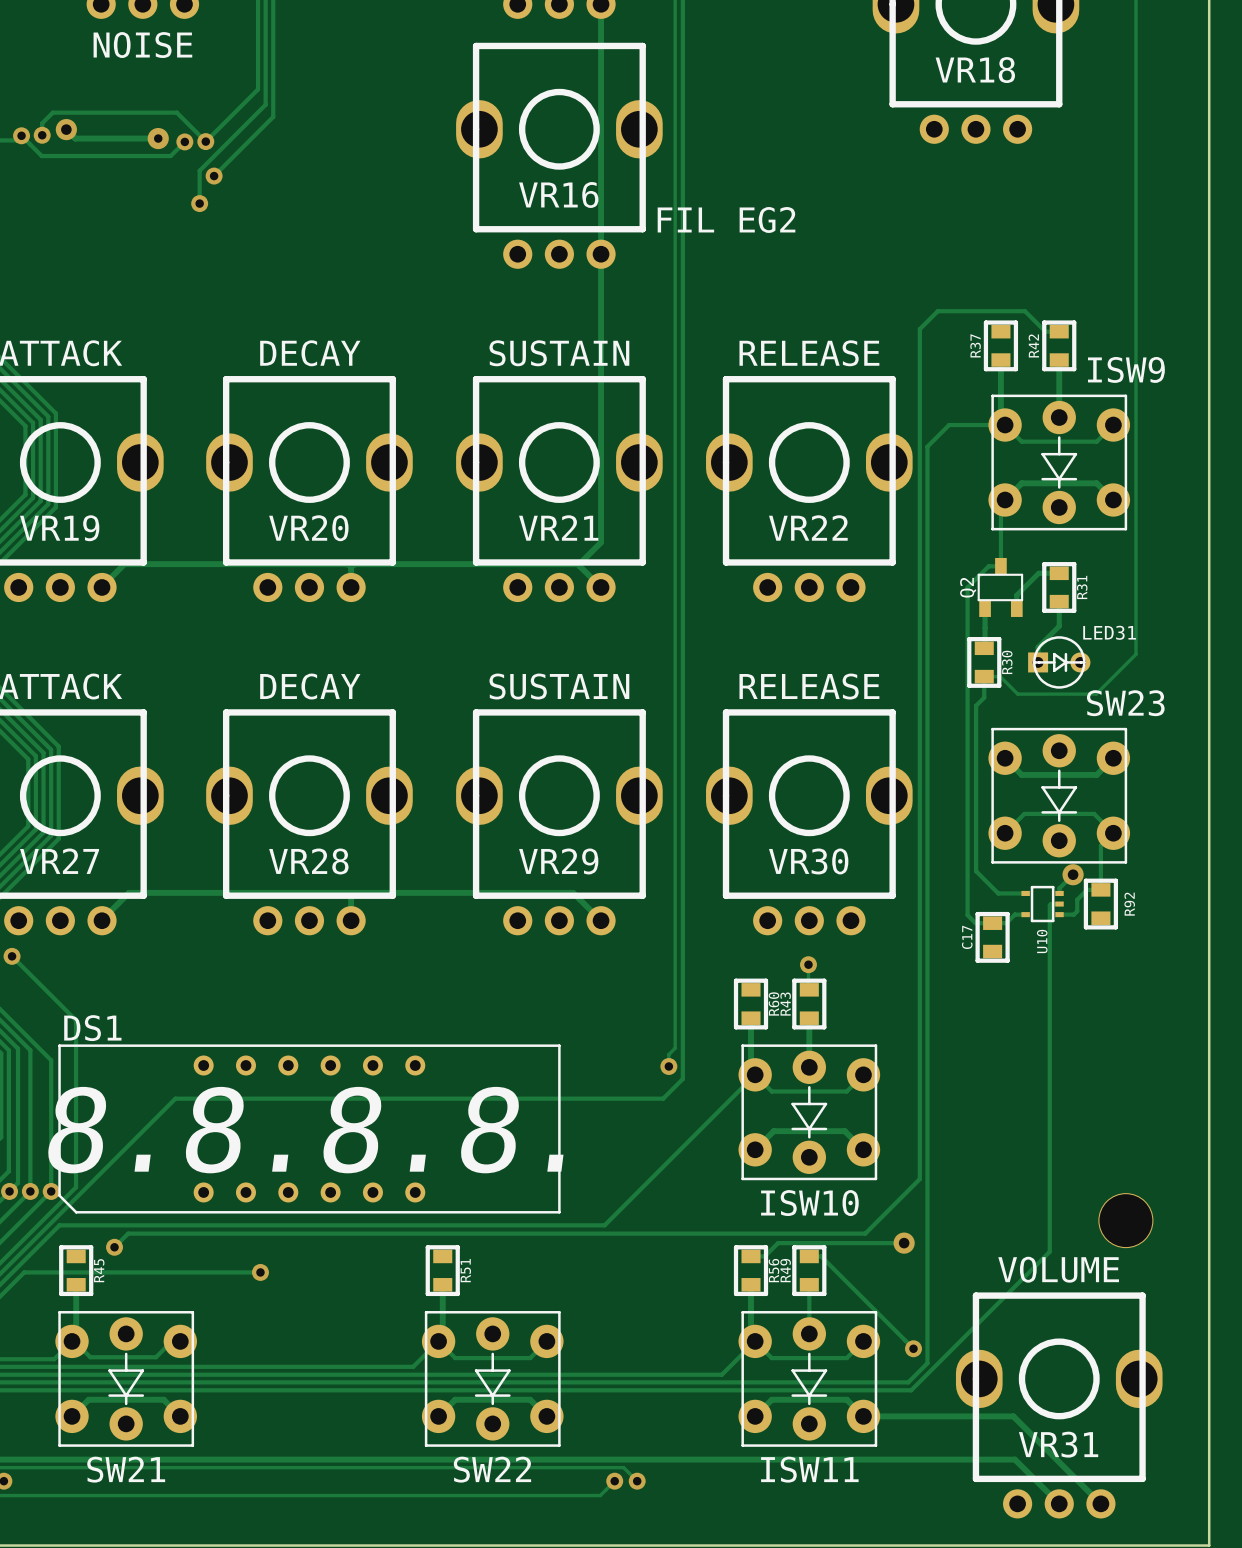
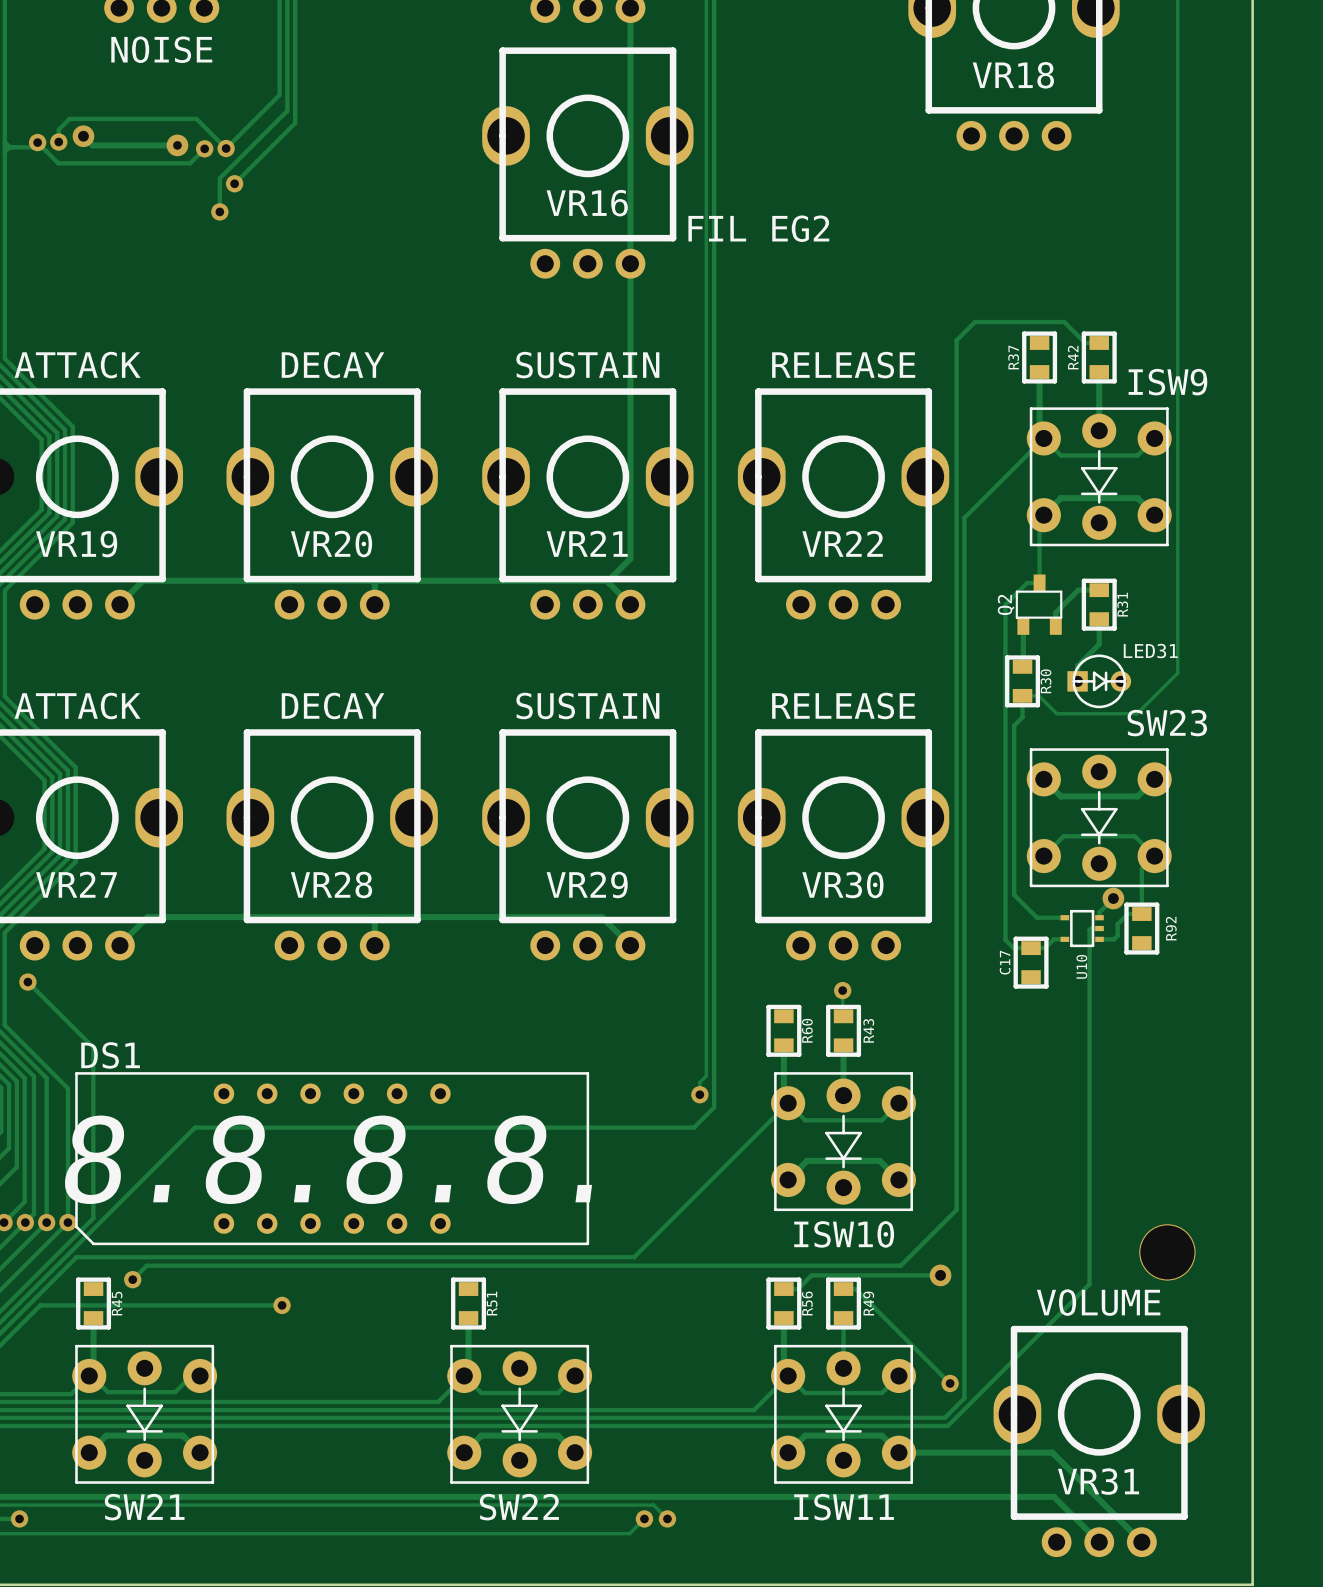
track: (1005, 425) (949, 425) (927, 446) (927, 502) -> (1043, 438) (964, 517)
R43 name position: R43 (785, 1004) -> R43 (868, 1030)
R49 name position: R49 (785, 1270) -> R49 (868, 1303)

